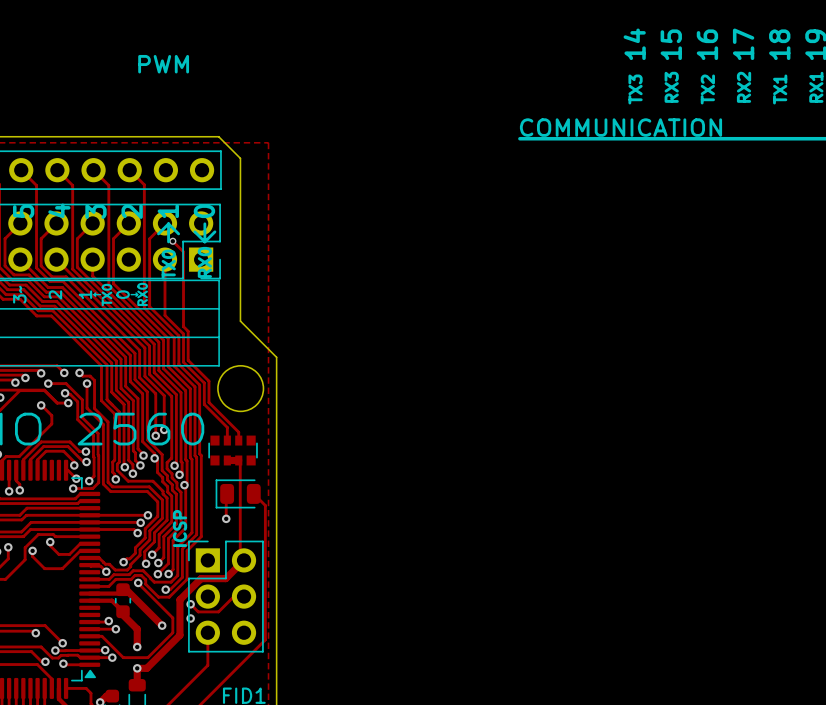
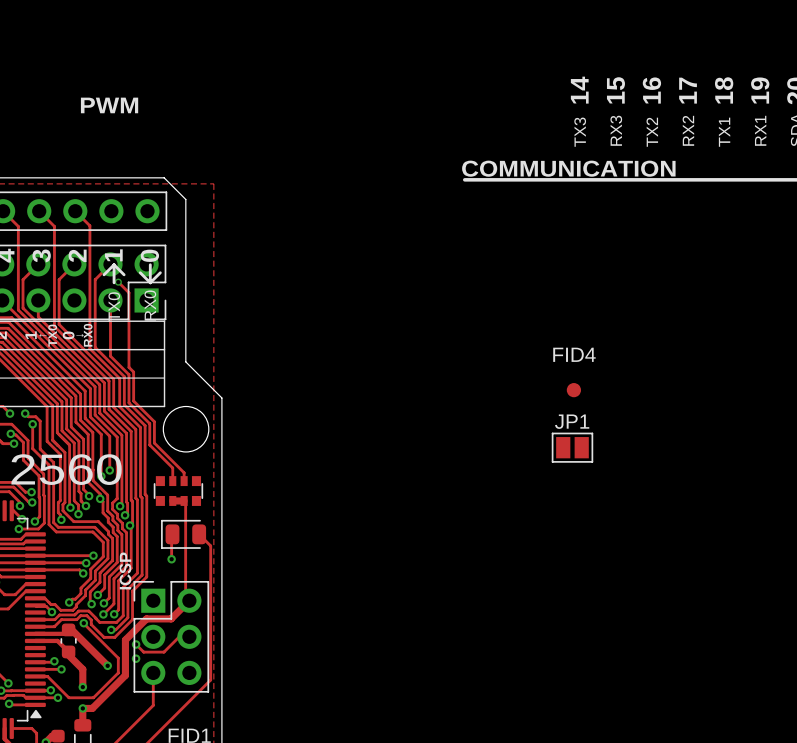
FID4: none -> (573, 390)
JP1: none -> (572, 447)

